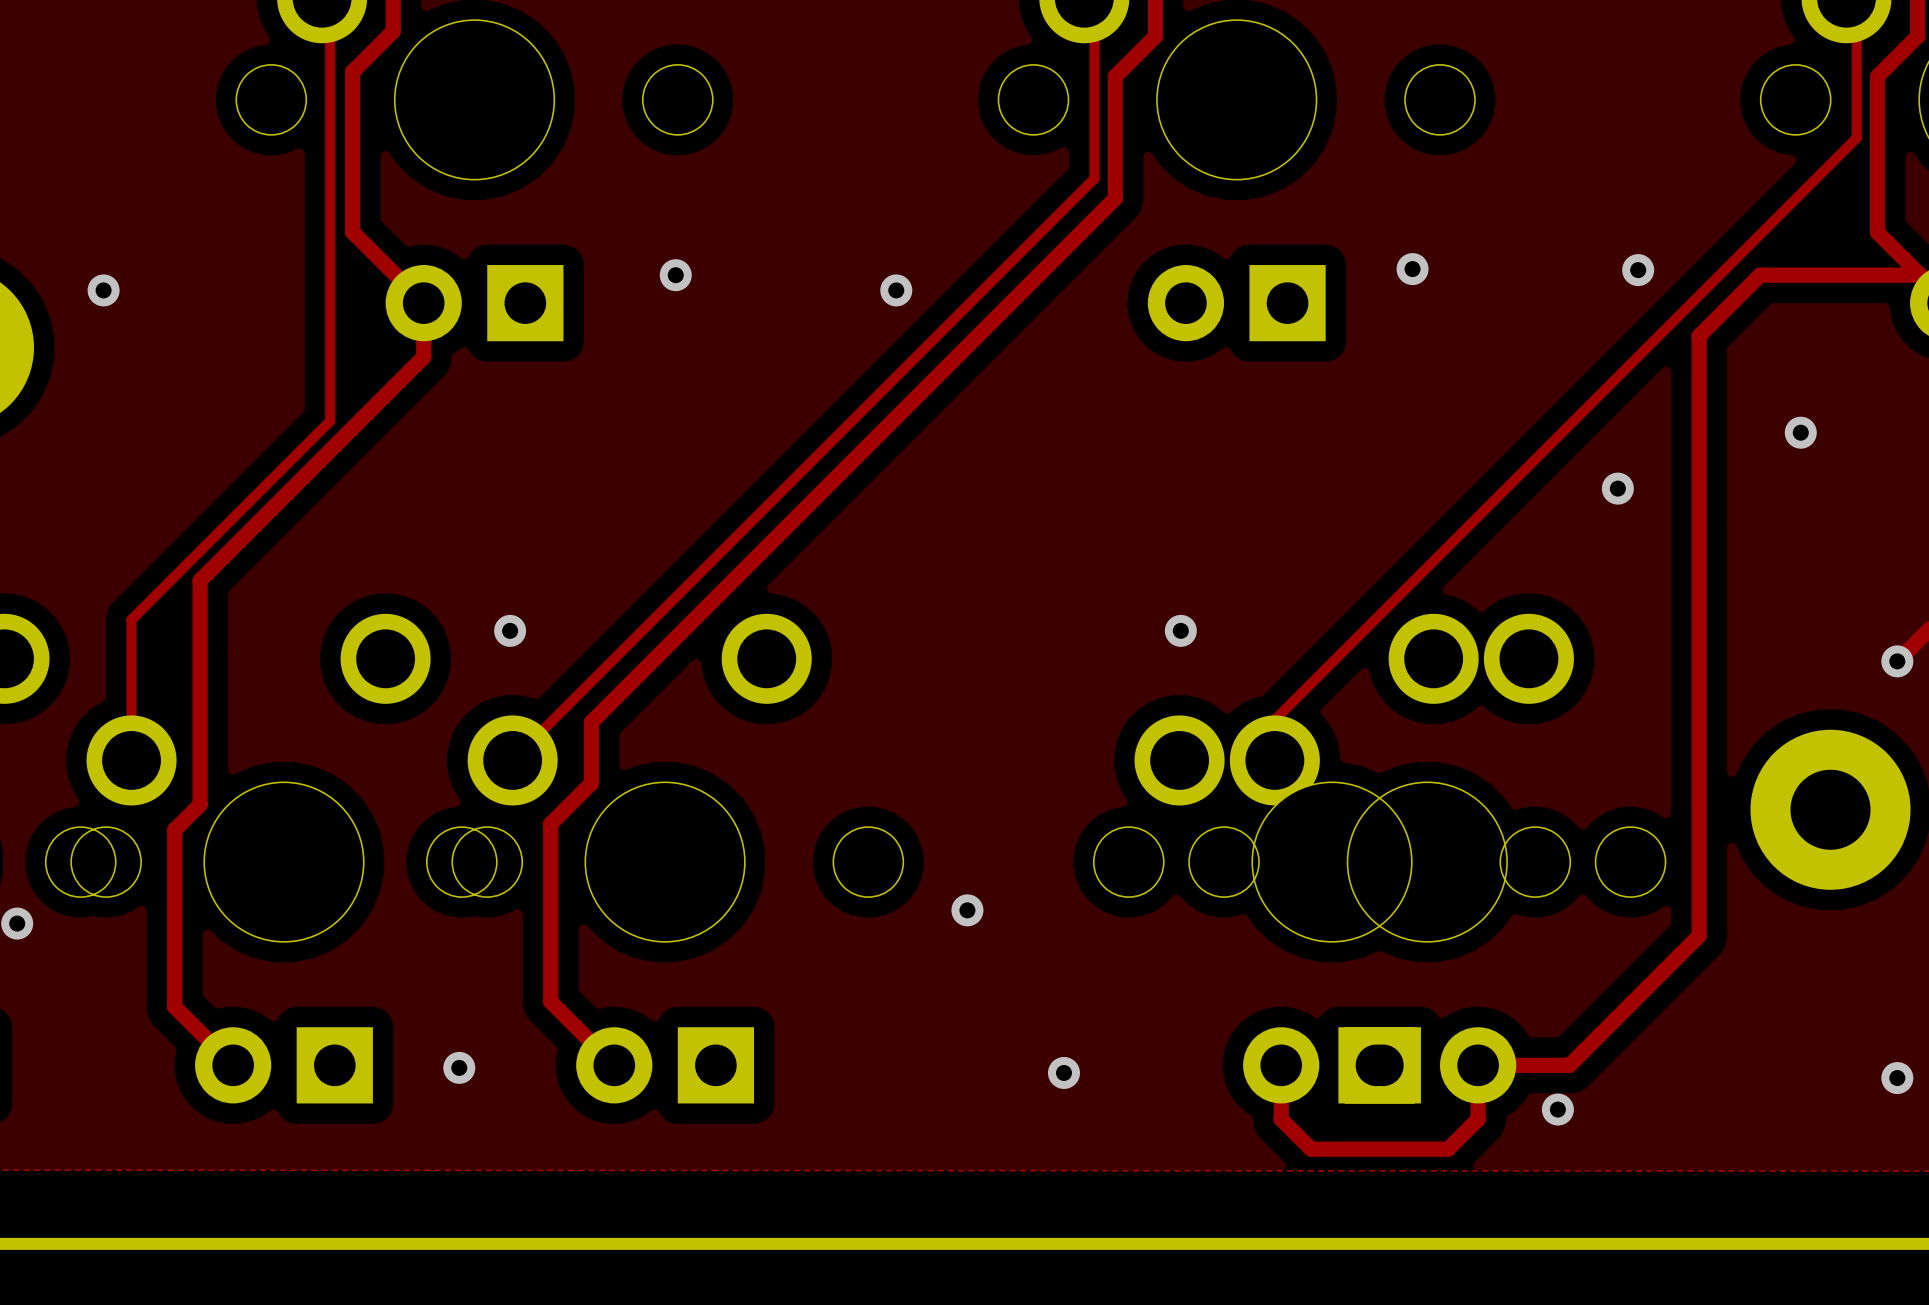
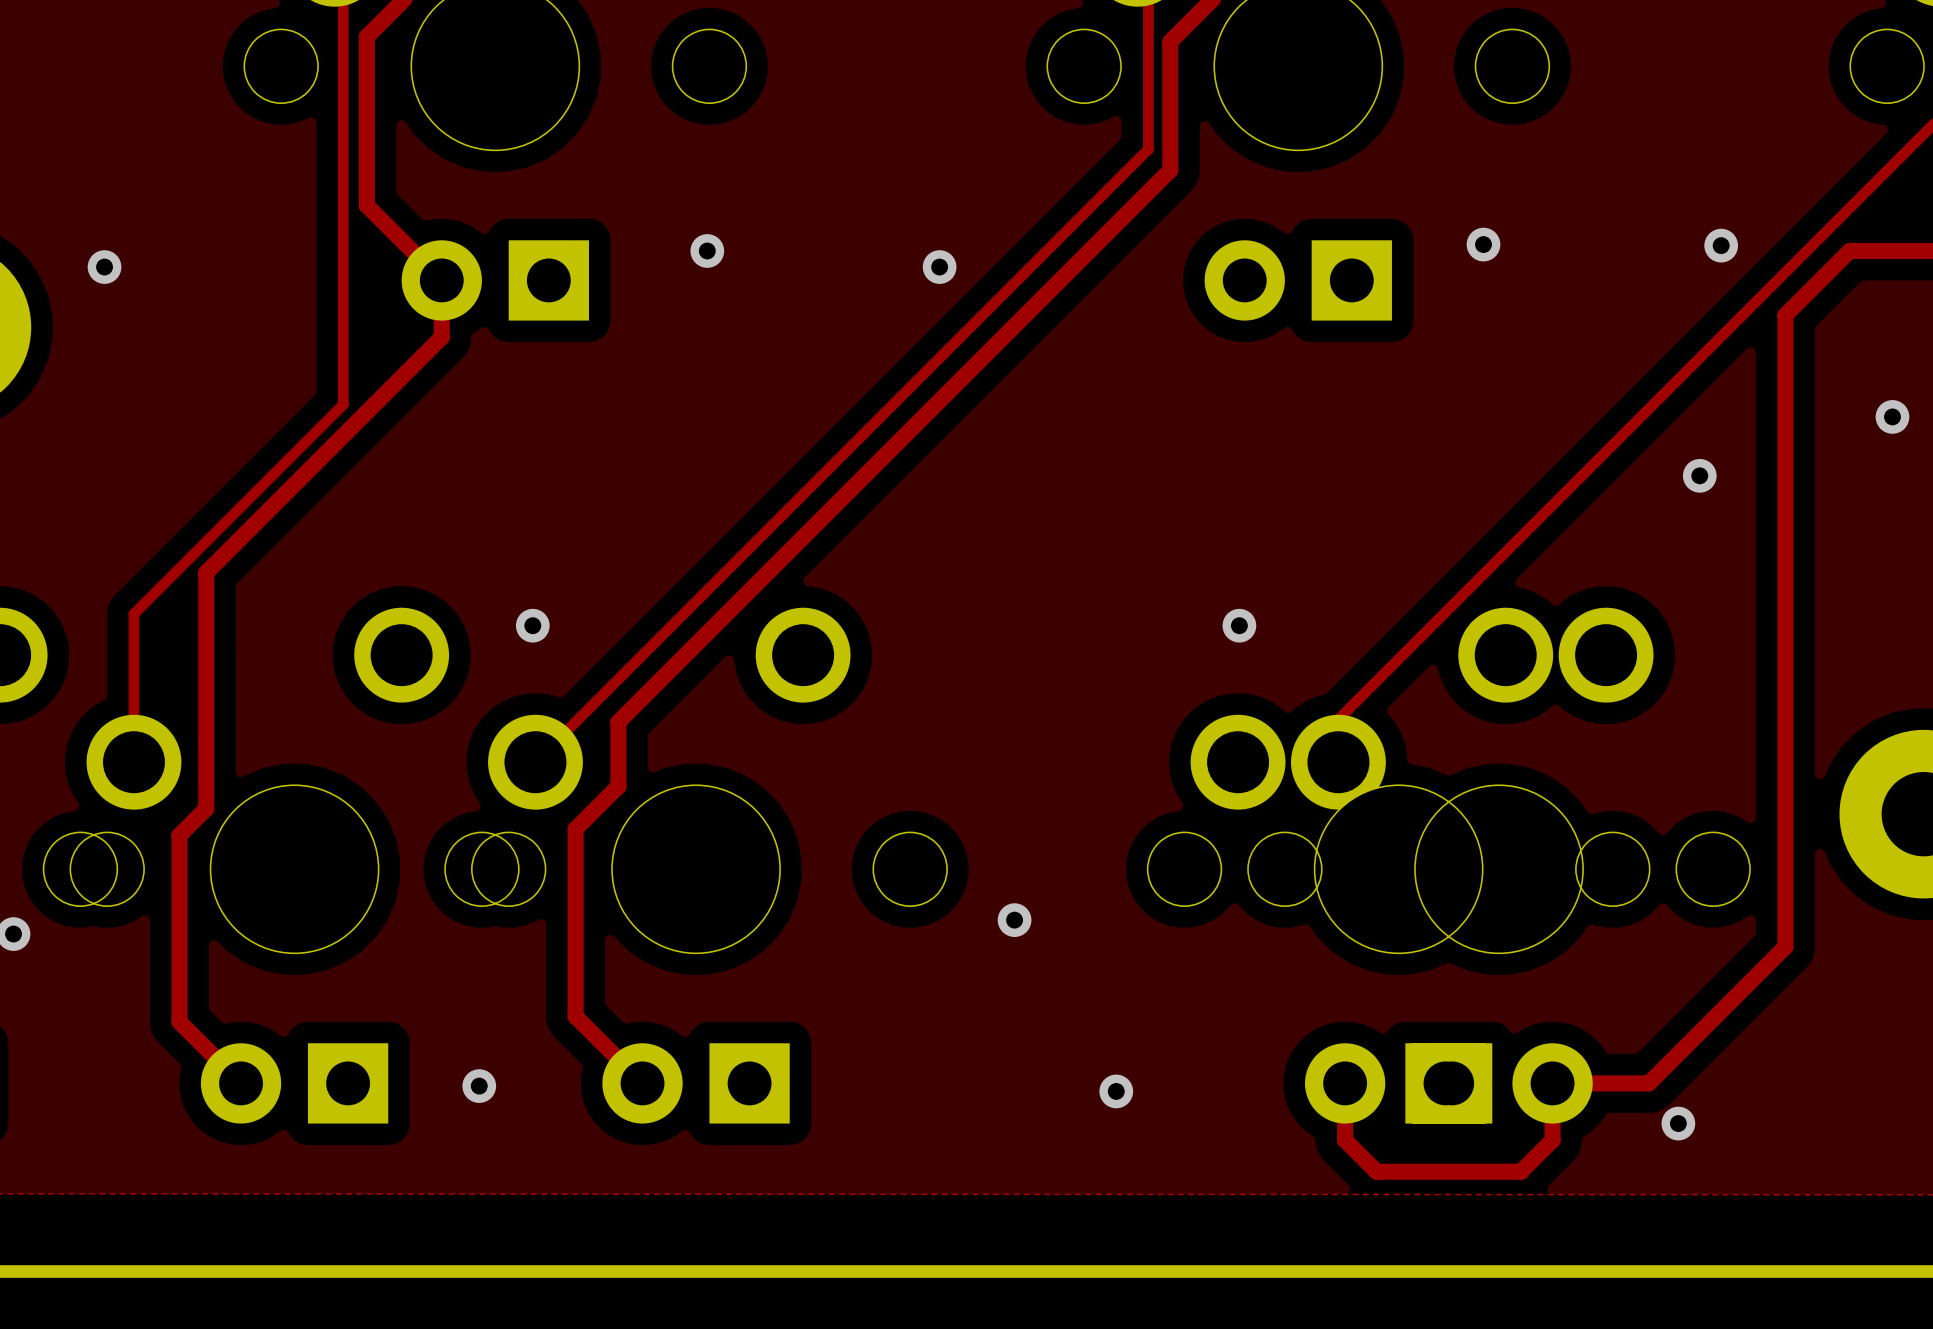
via position: (1557, 1109) -> (1678, 1123)

